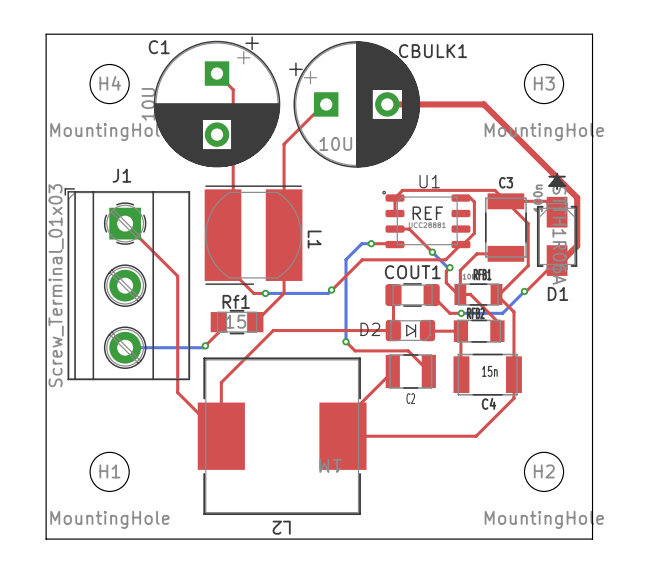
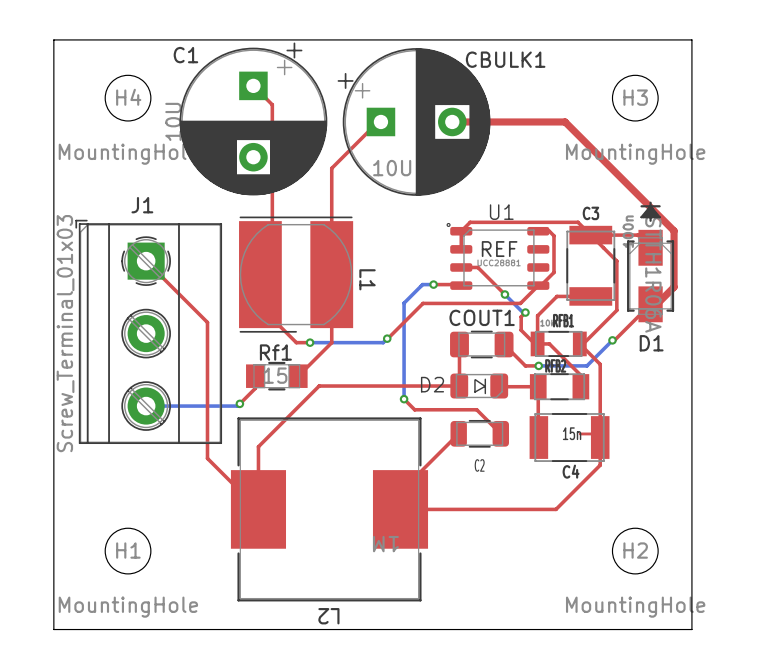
C2 footprint: [385, 354, 436, 389] -> [450, 419, 509, 448]
top track: none -> (580, 433) (596, 433) (600, 437)

